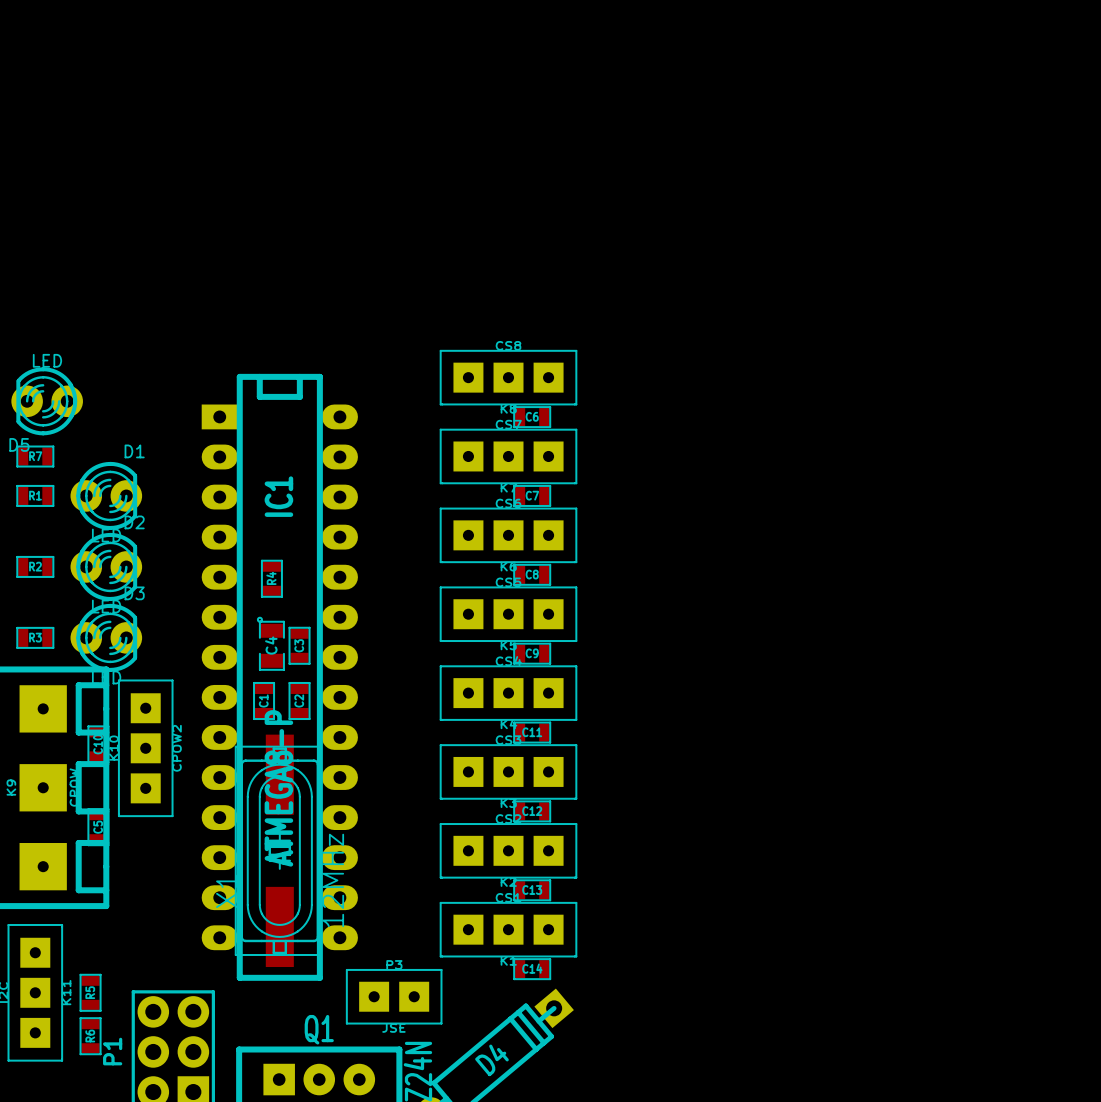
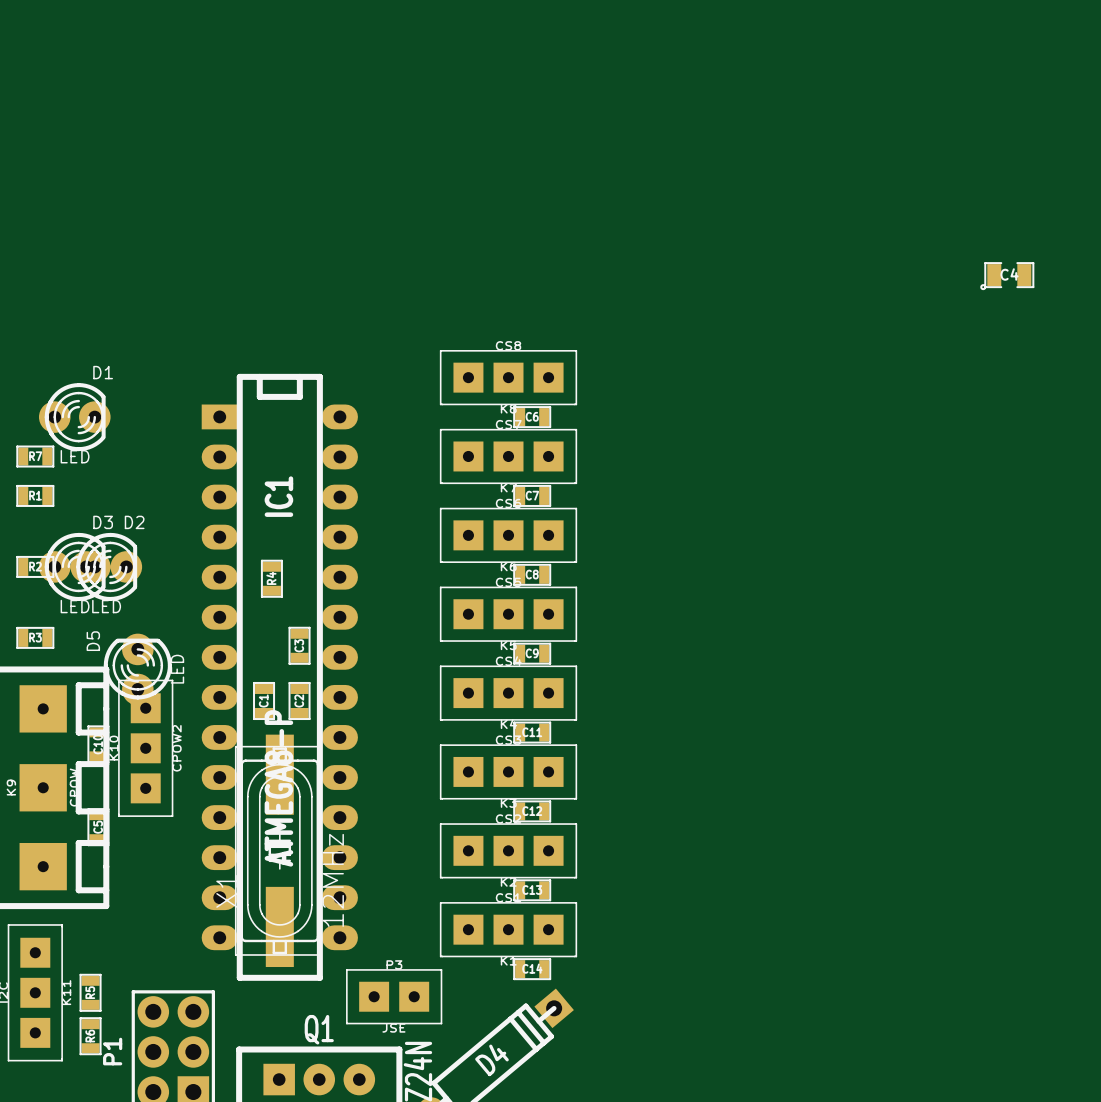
D5 rotation: 0° (47, 401) -> 90° clockwise (137, 669)
D5 position: (47, 401) -> (137, 669)
D1 position: (106, 495) -> (74, 417)
D3 position: (106, 637) -> (74, 566)
C4 rotation: 0° (270, 643) -> 90° counterclockwise (1007, 276)
C4 position: (270, 643) -> (1007, 276)

